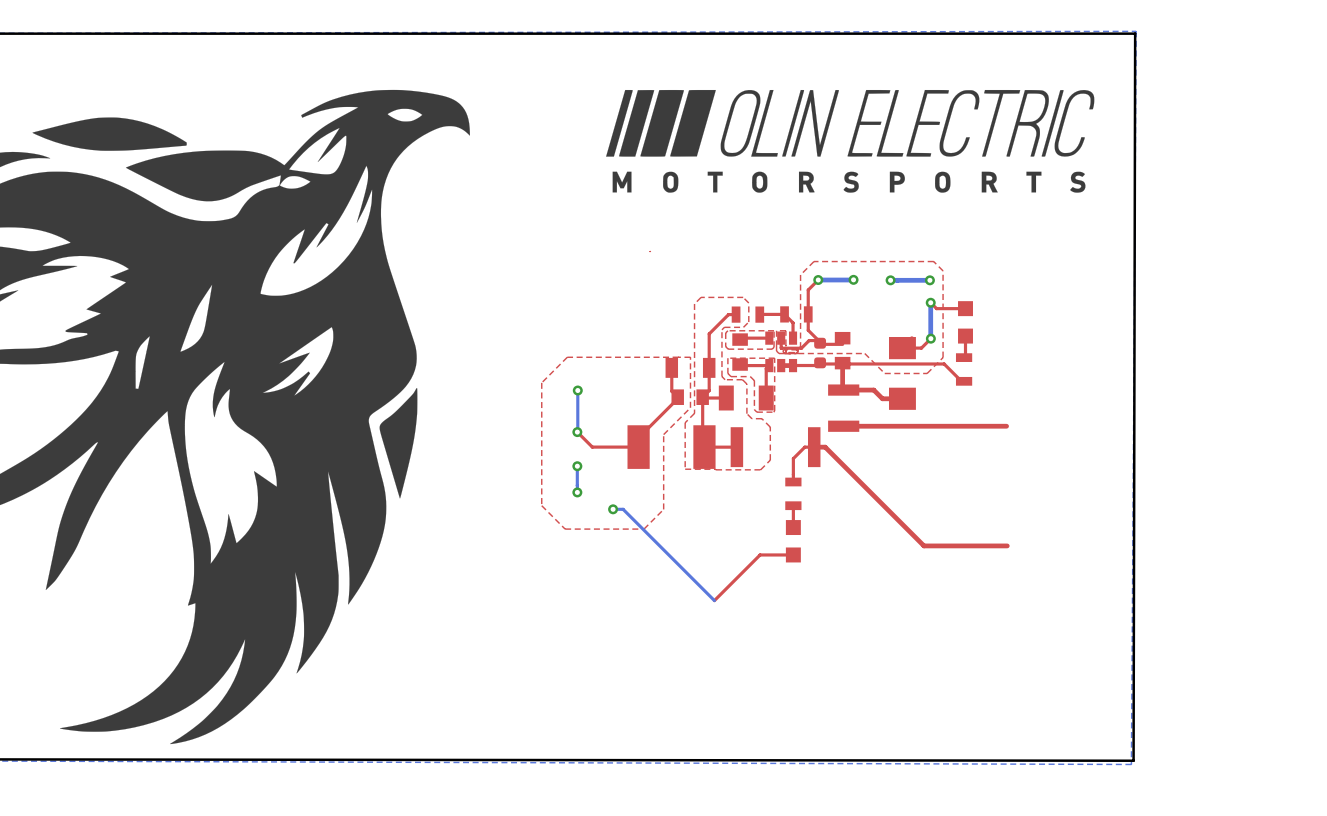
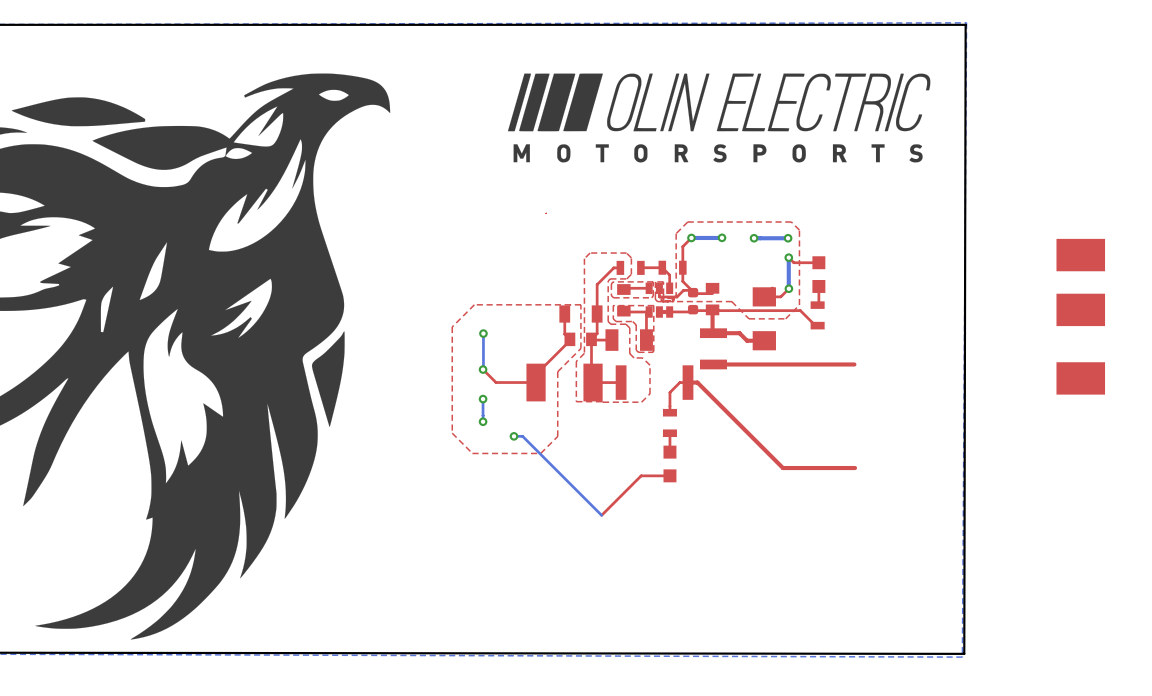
part: none -> (1080, 255)
part: none -> (1080, 309)
part: none -> (1080, 378)

